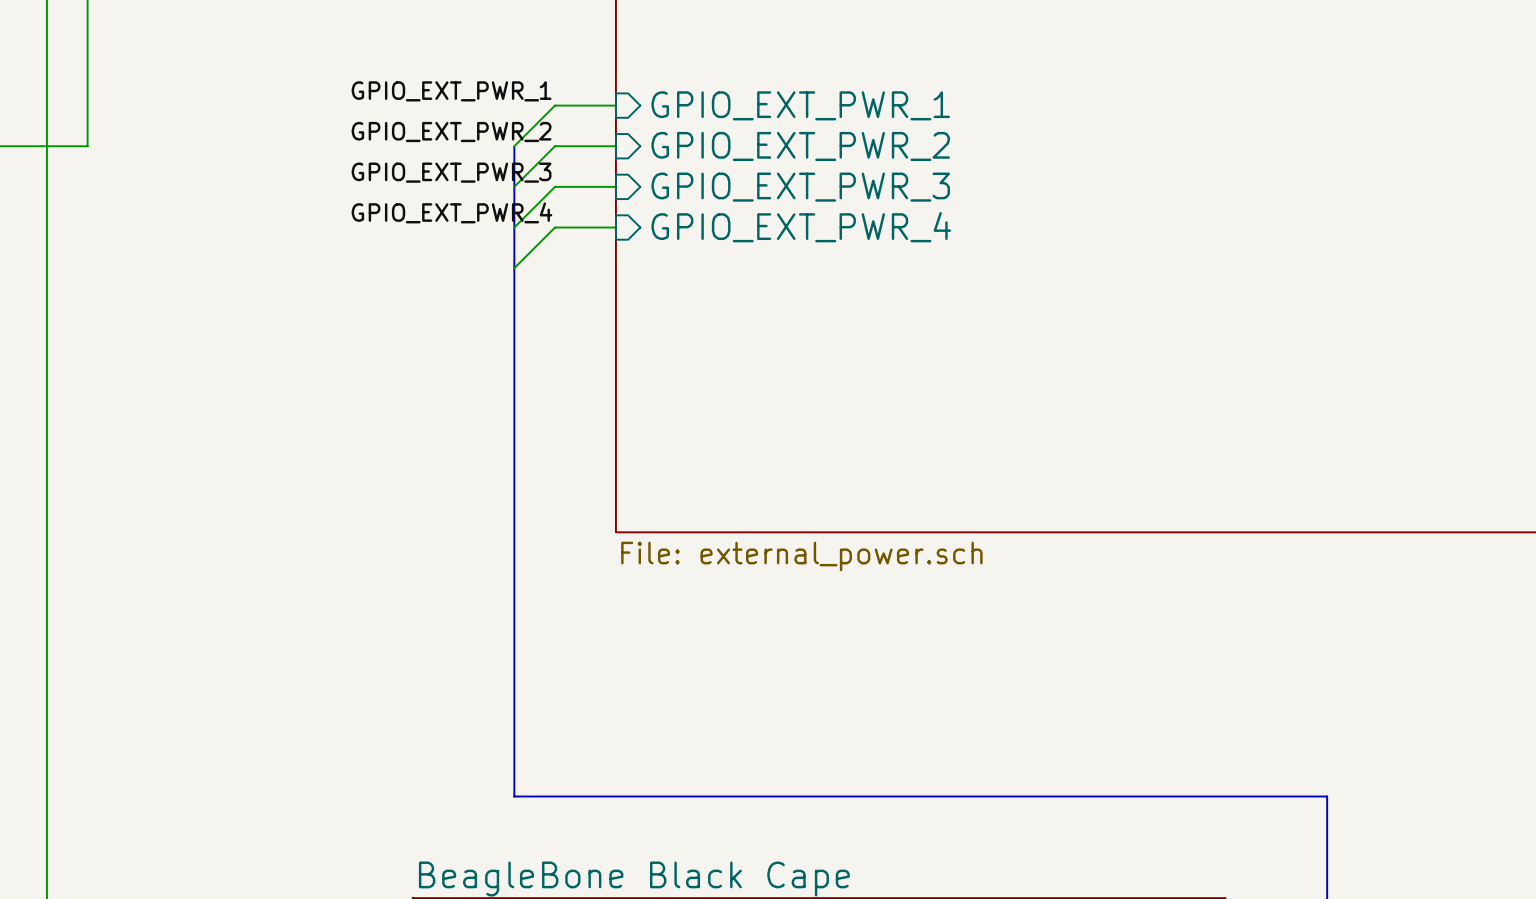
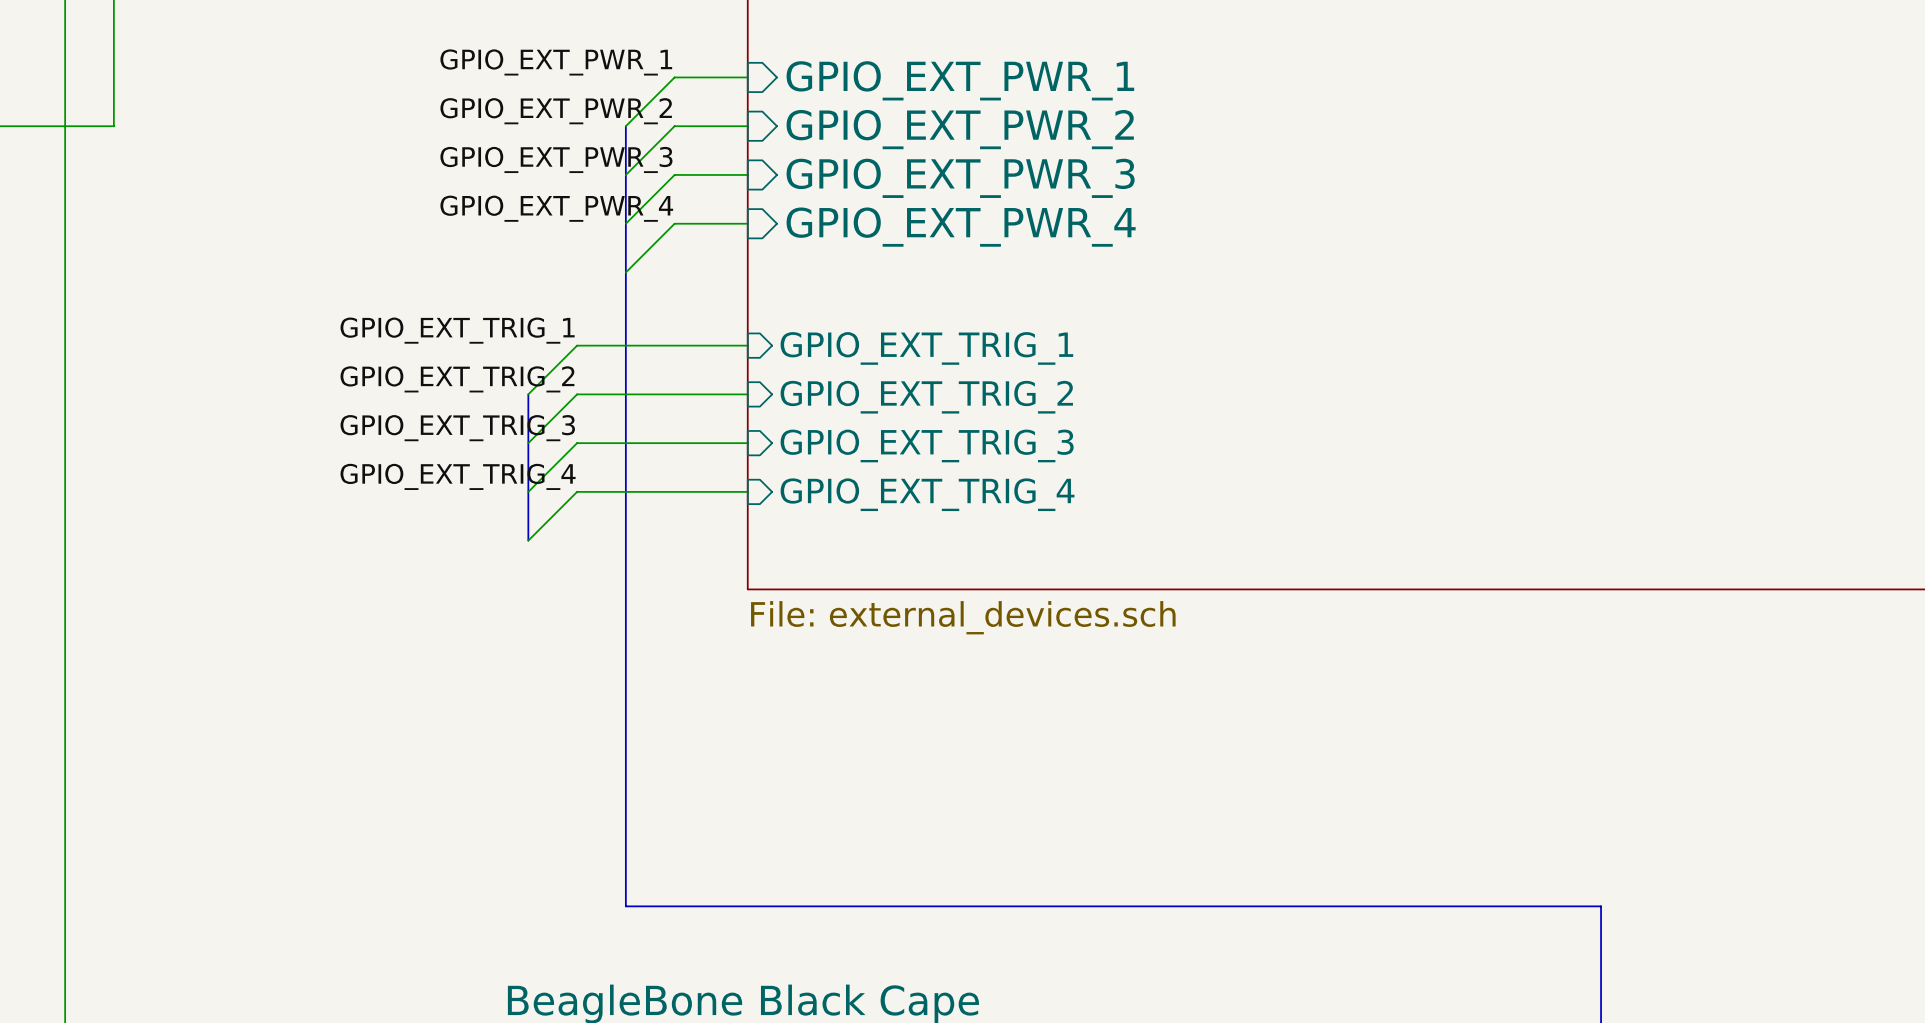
label: none -> GPIO_EXT_TRIG_1 (457, 330)
wire: none -> (747, 345) (577, 345) (528, 394)
sheet pin: none -> GPIO_EXT_TRIG_1 (926, 348)
label: none -> GPIO_EXT_TRIG_2 (457, 379)
bus: none -> (528, 394) (528, 540)
wire: none -> (747, 394) (577, 394) (528, 443)
sheet pin: none -> GPIO_EXT_TRIG_2 (926, 397)
label: none -> GPIO_EXT_TRIG_3 (457, 428)
wire: none -> (747, 443) (577, 443) (528, 491)
sheet pin: none -> GPIO_EXT_TRIG_3 (927, 445)
label: none -> GPIO_EXT_TRIG_4 (458, 476)
sheet pin: none -> GPIO_EXT_TRIG_4 (927, 494)
wire: none -> (747, 491) (577, 491) (528, 540)
sheet value: File: external_power.sch (801, 556) -> File: external_devices.sch (963, 617)

